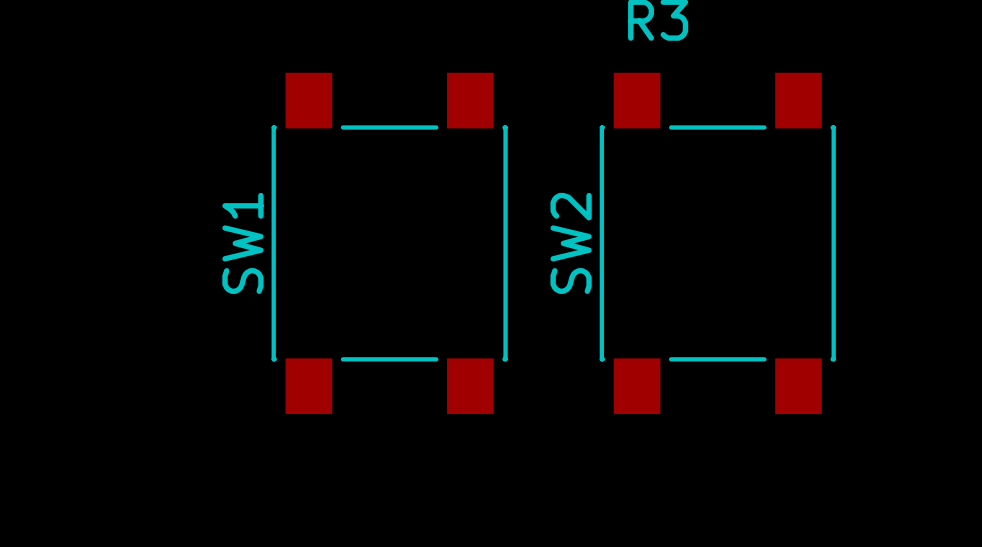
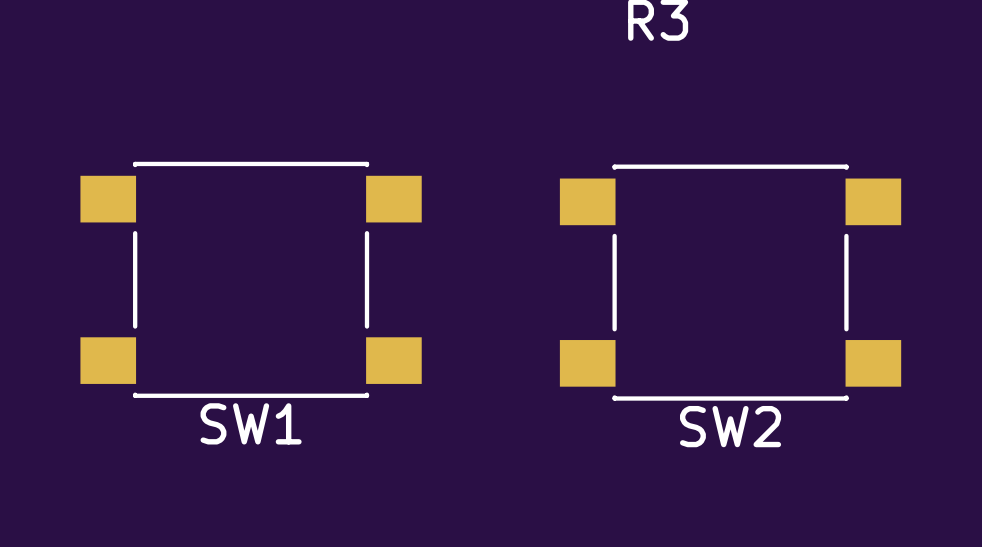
SW1 name position: SW1 (242, 243) -> SW1 (251, 423)
SW1 rotation: 0° (389, 243) -> 90° clockwise (251, 279)
SW2 name position: SW2 (571, 243) -> SW2 (730, 426)
SW2 rotation: 0° (717, 243) -> 90° clockwise (730, 282)

